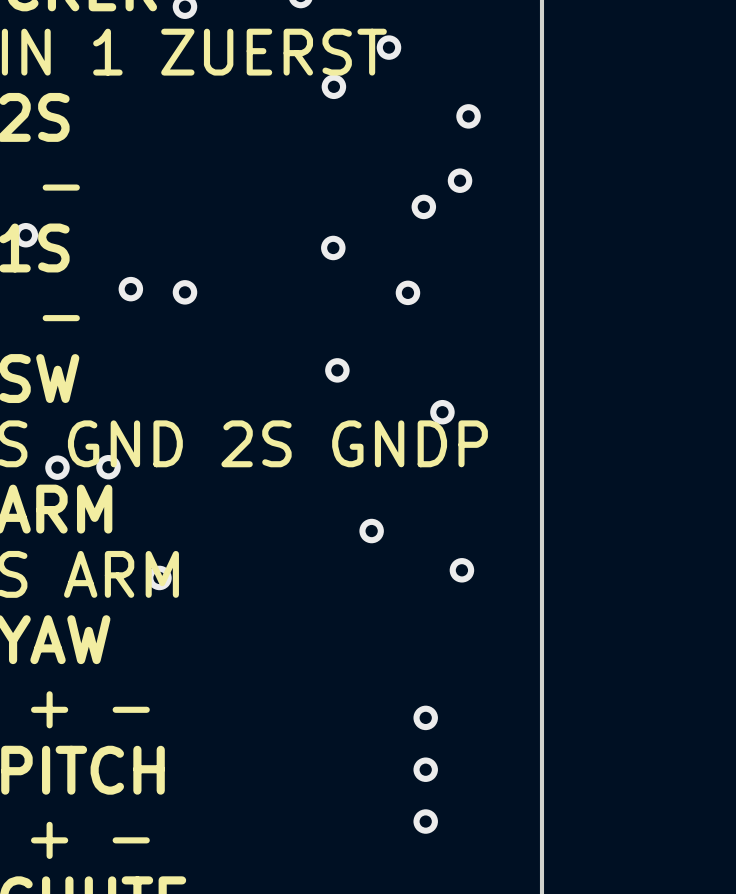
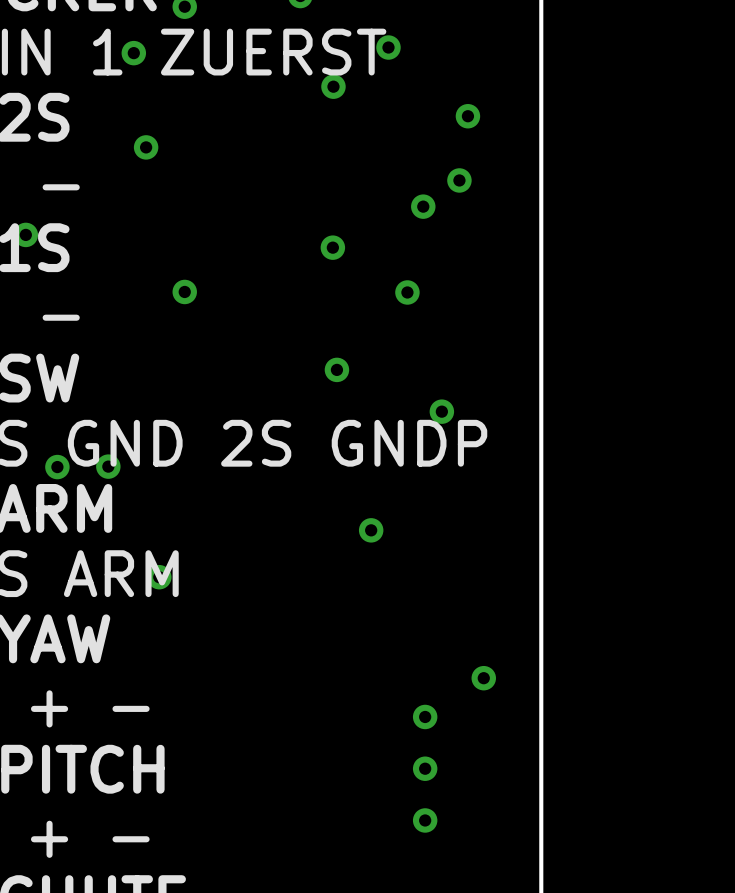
via: none -> (133, 53)
via: none -> (146, 147)
via: (130, 289) -> none
via position: (461, 570) -> (483, 678)

